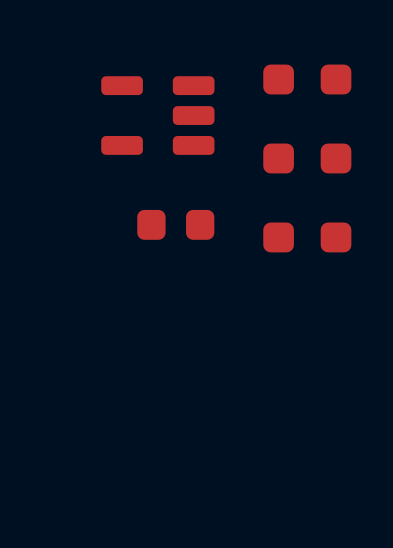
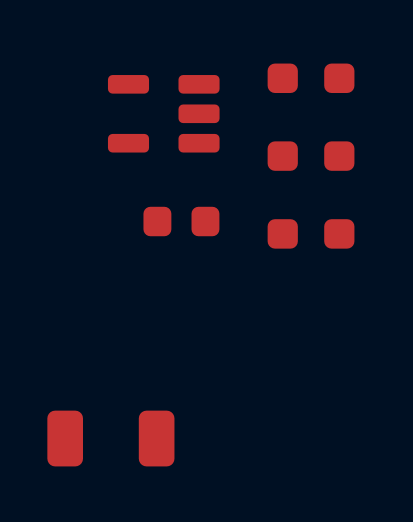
part: none -> (110, 438)

